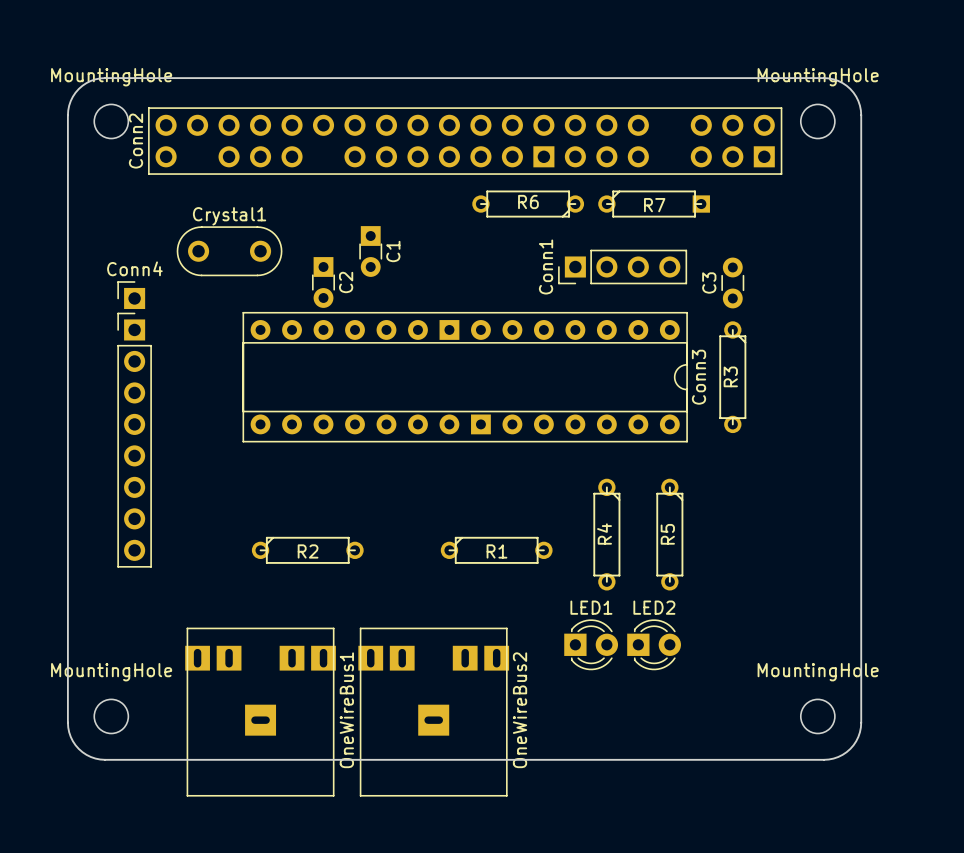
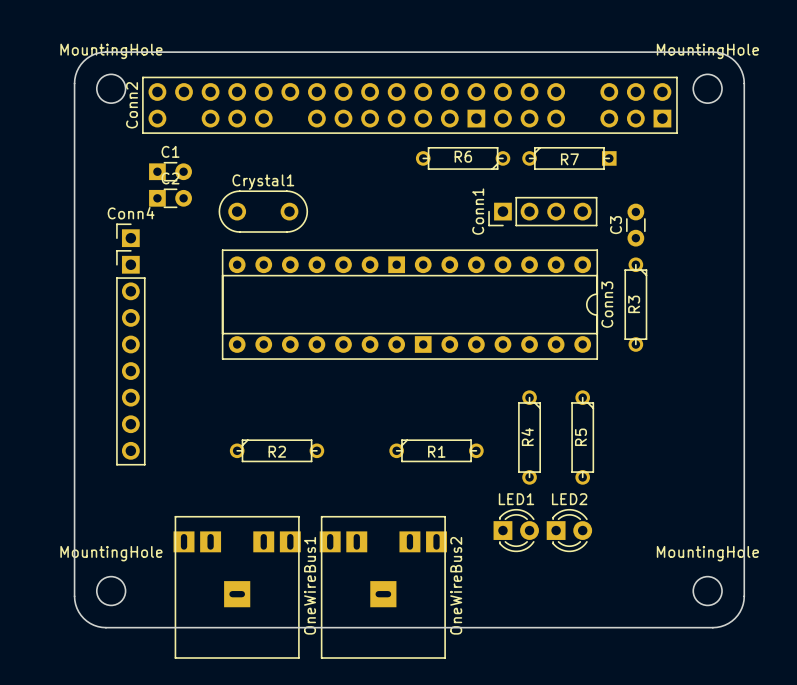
Crystal1 position: (229, 251) -> (263, 211)
C1 rotation: 0° (370, 251) -> 90° counterclockwise (170, 171)
C1 position: (370, 251) -> (170, 171)
C2 rotation: 0° (323, 282) -> 90° counterclockwise (170, 198)
C2 position: (323, 282) -> (170, 198)

